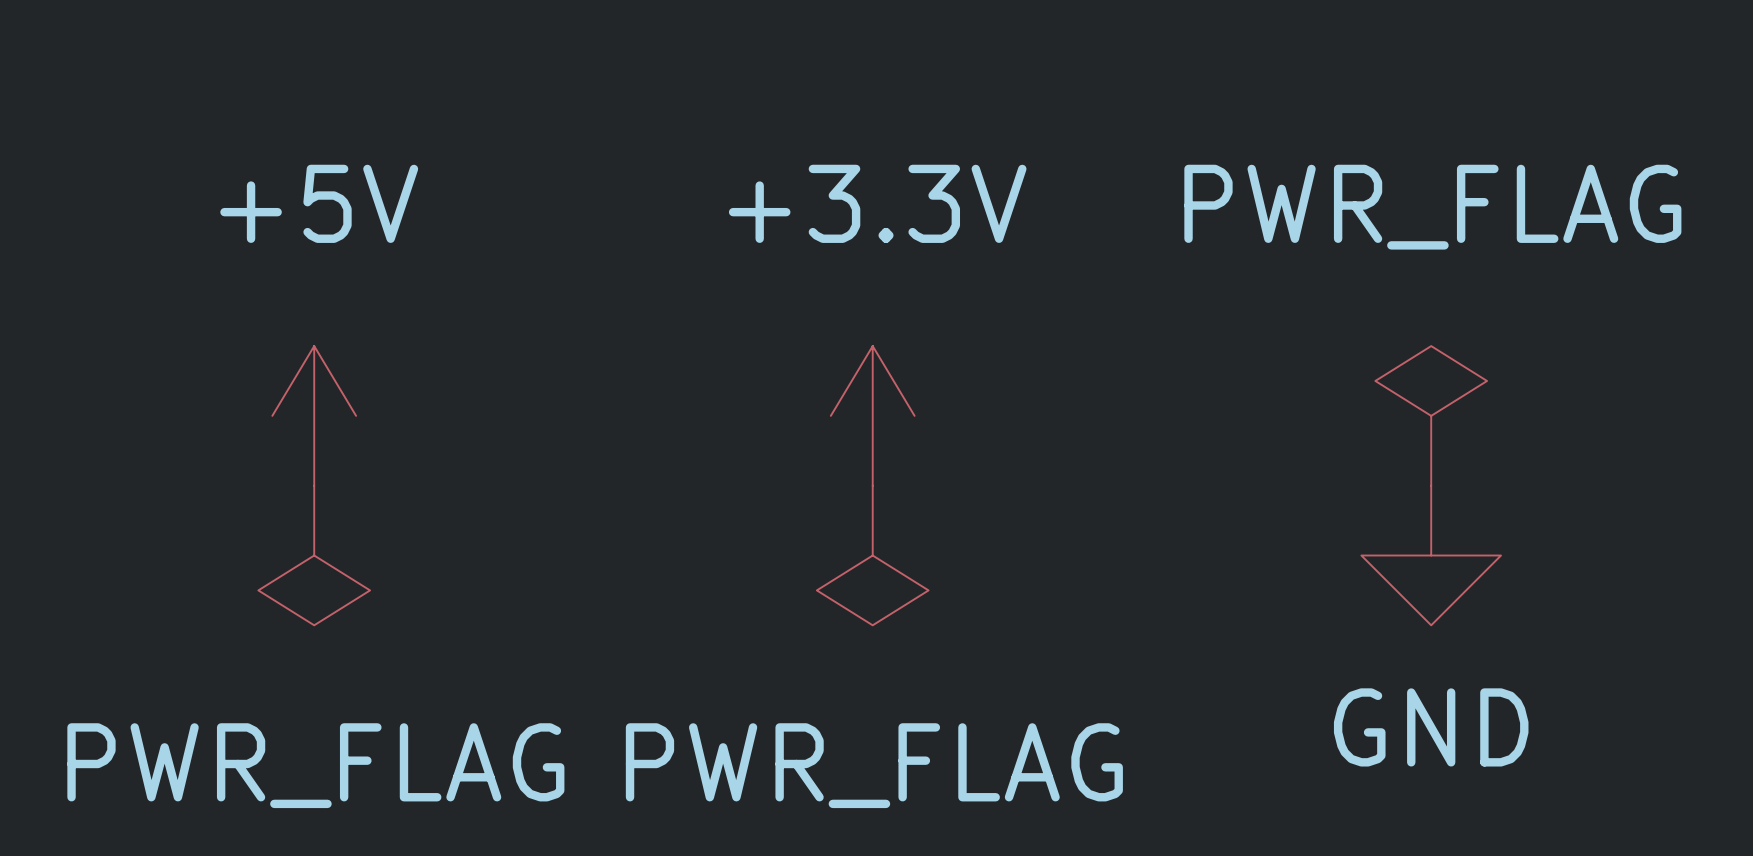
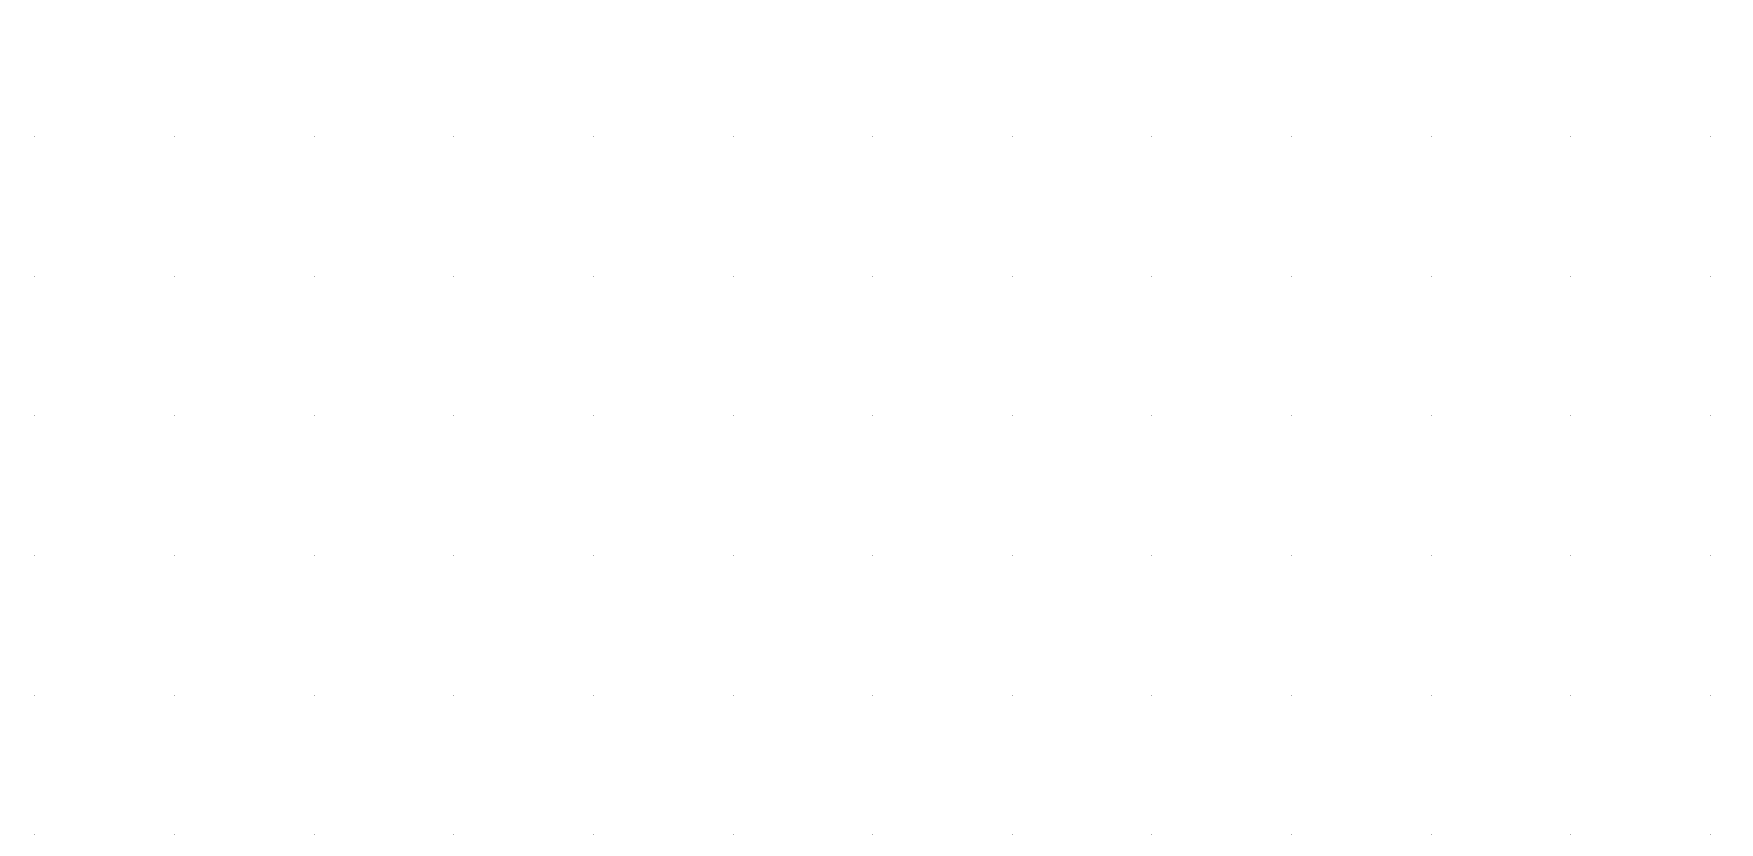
power symbol: +5V (314, 415) -> none
power symbol: +3.3V (872, 415) -> none
power symbol: PWR_FLAG (1431, 415) -> none
power symbol: PWR_FLAG (314, 555) -> none
power symbol: PWR_FLAG (872, 555) -> none
power symbol: GND (1431, 555) -> none

